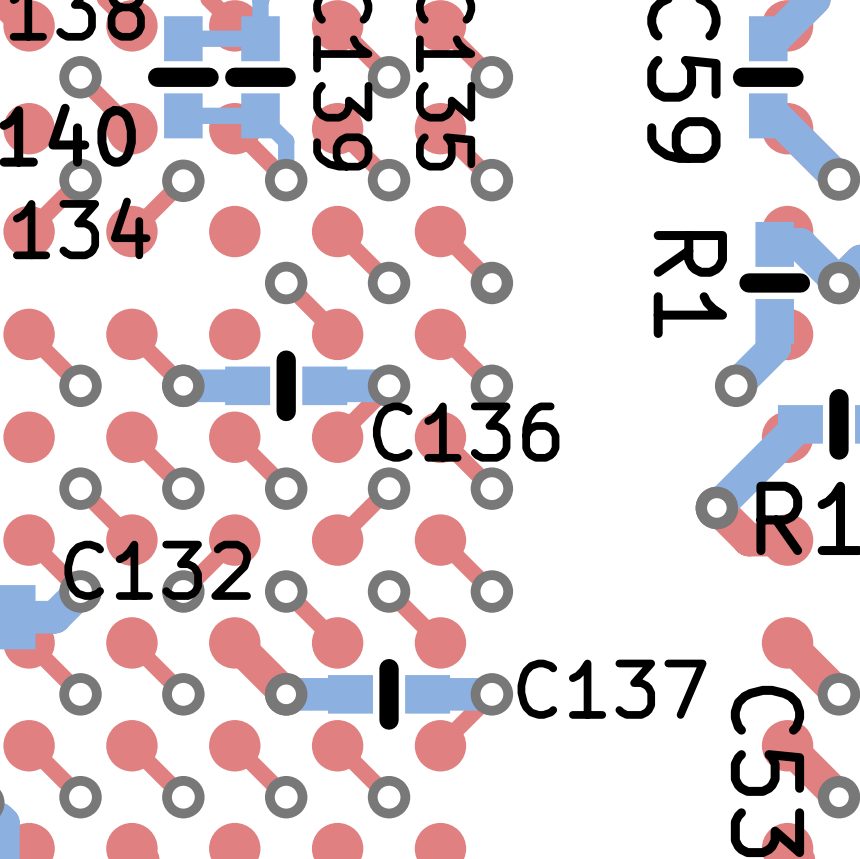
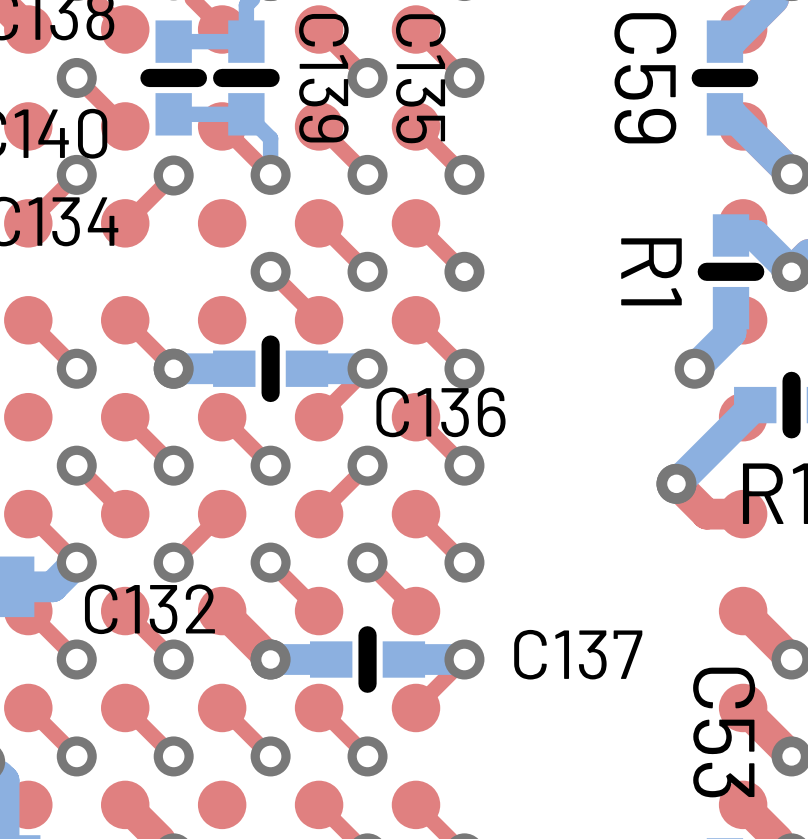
C132 name position: C132 (157, 570) -> C132 (149, 609)

